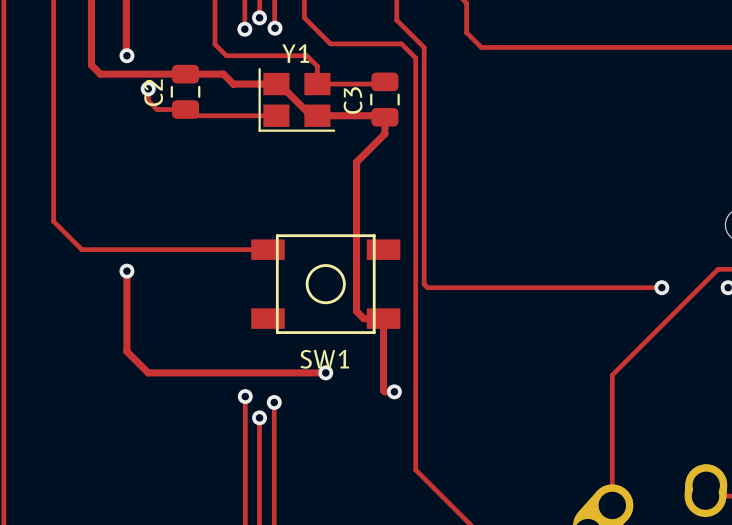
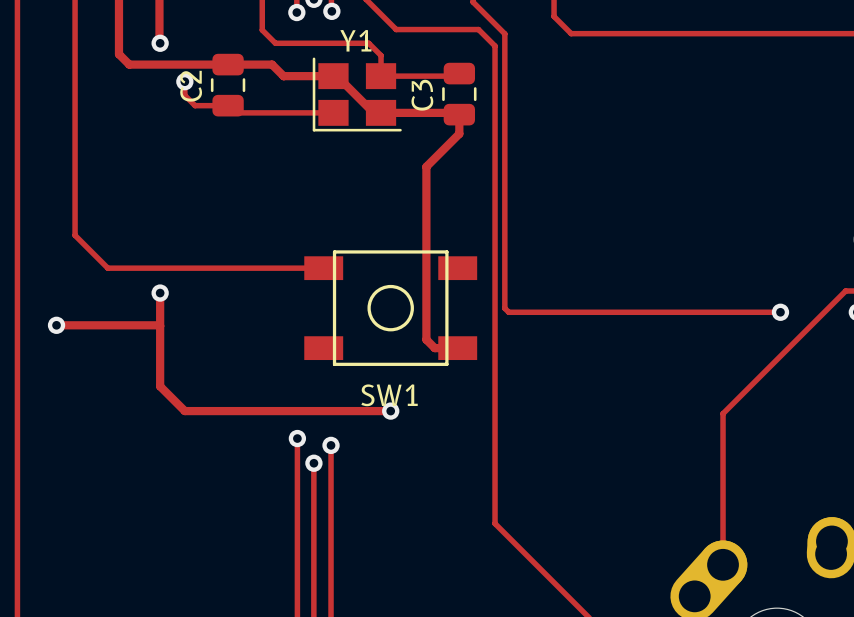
track: none -> (56, 325) (160, 325)
via: none -> (56, 325)
track: (383, 318) (383, 390) (394, 391) -> none
via: (394, 391) -> none

